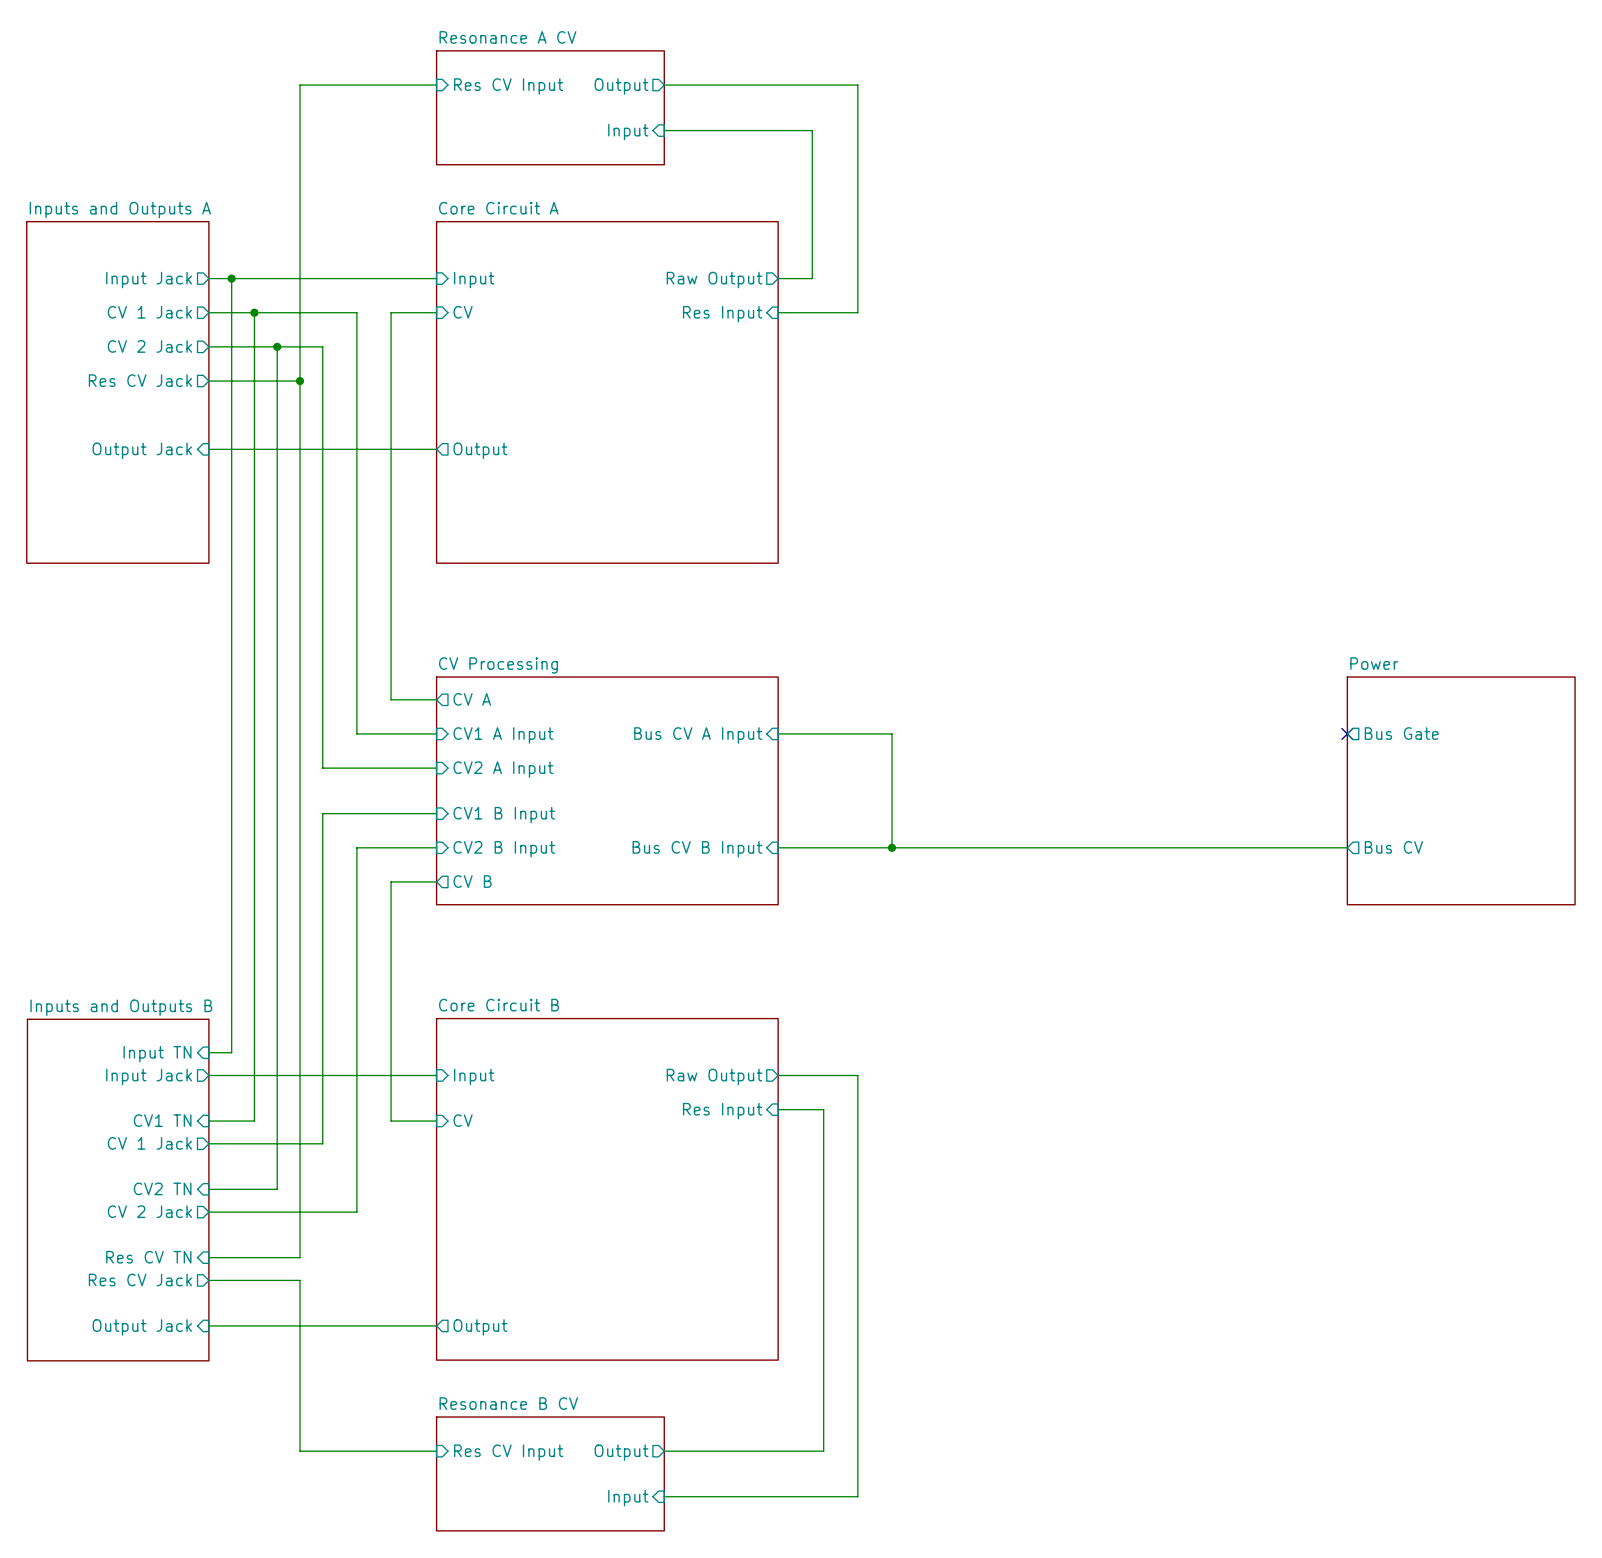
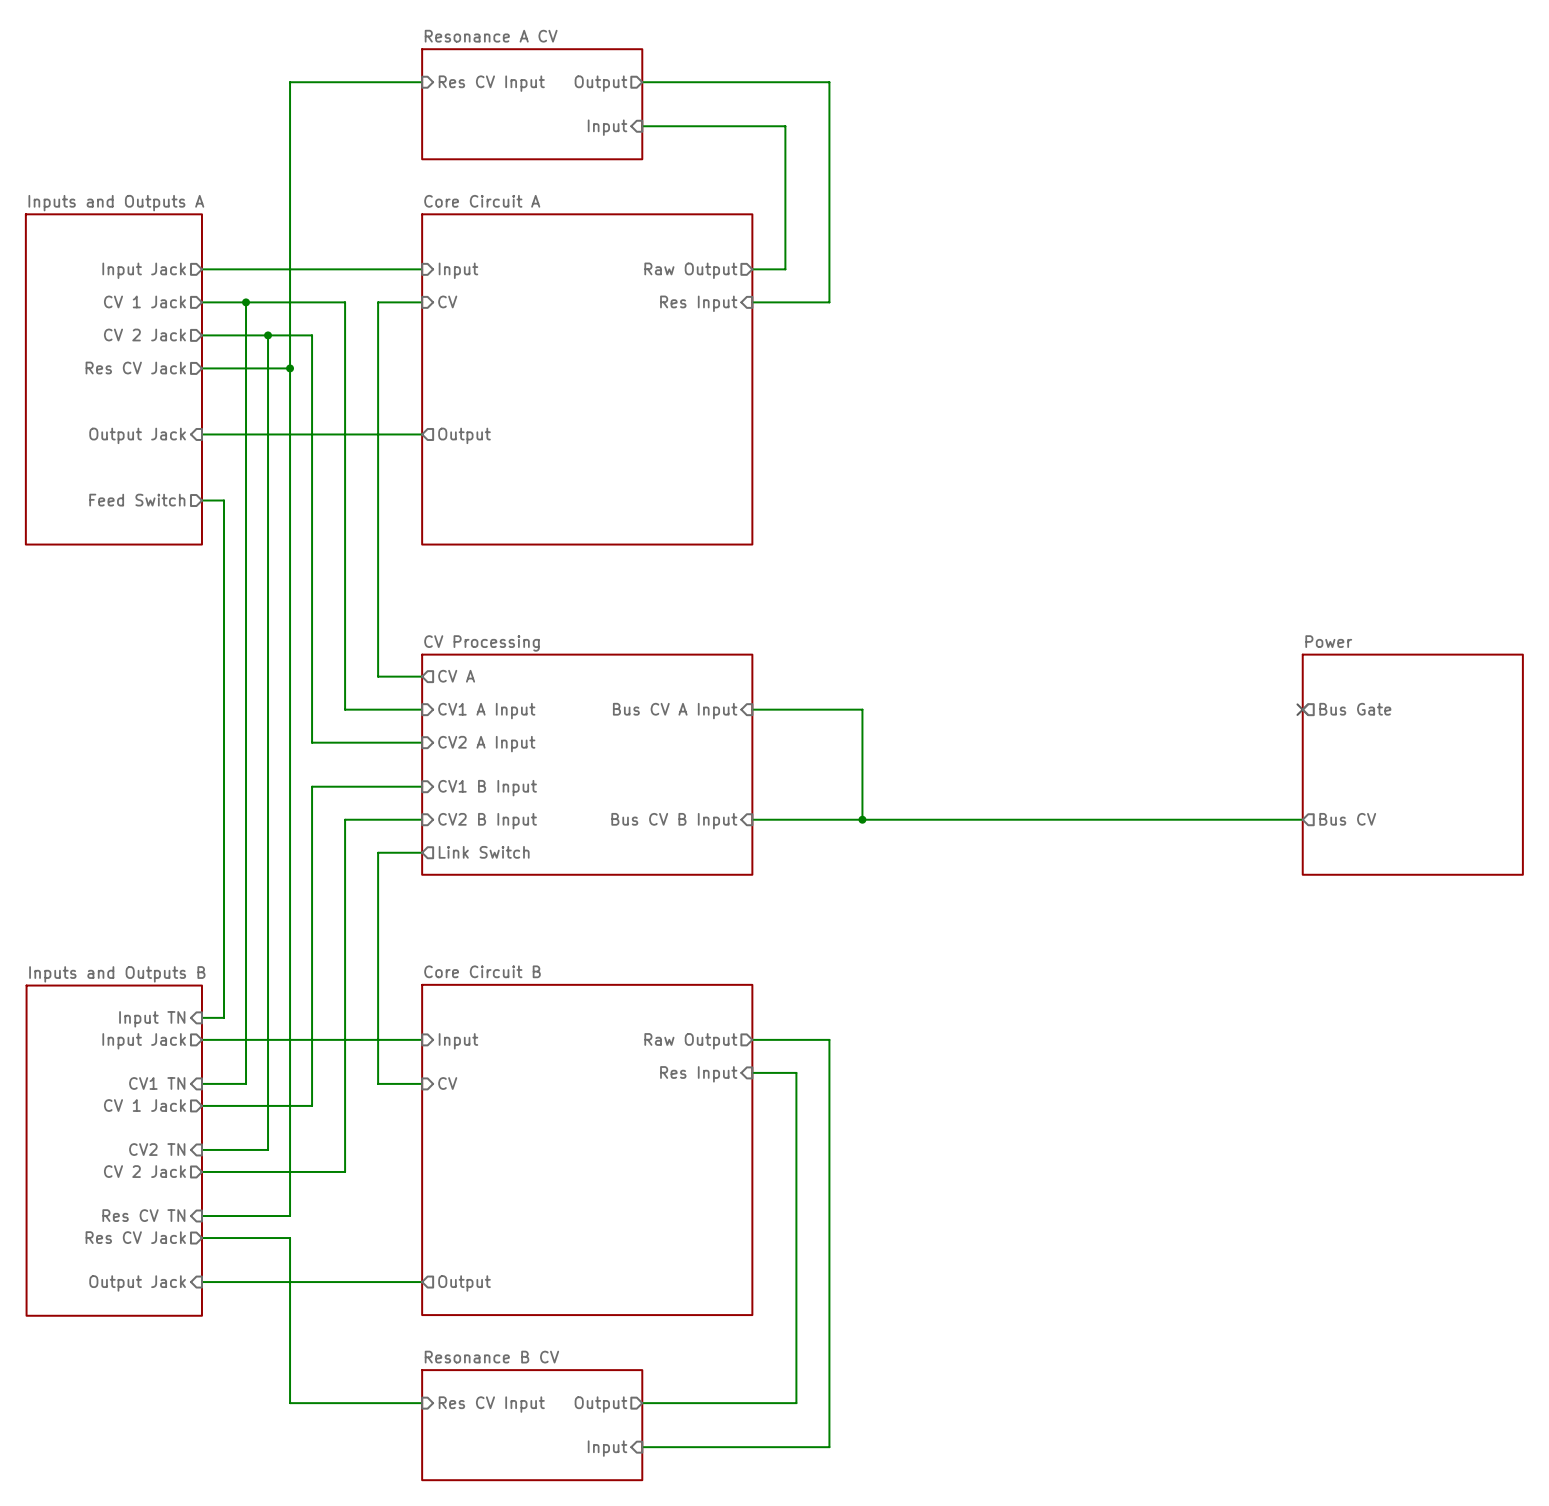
wire: (231, 278) (231, 517) -> (201, 500) (224, 500)
junction: (231, 278) -> none
sheet pin: none -> Feed Switch (137, 500)
sheet pin: CV B (472, 881) -> Link Switch (484, 852)

